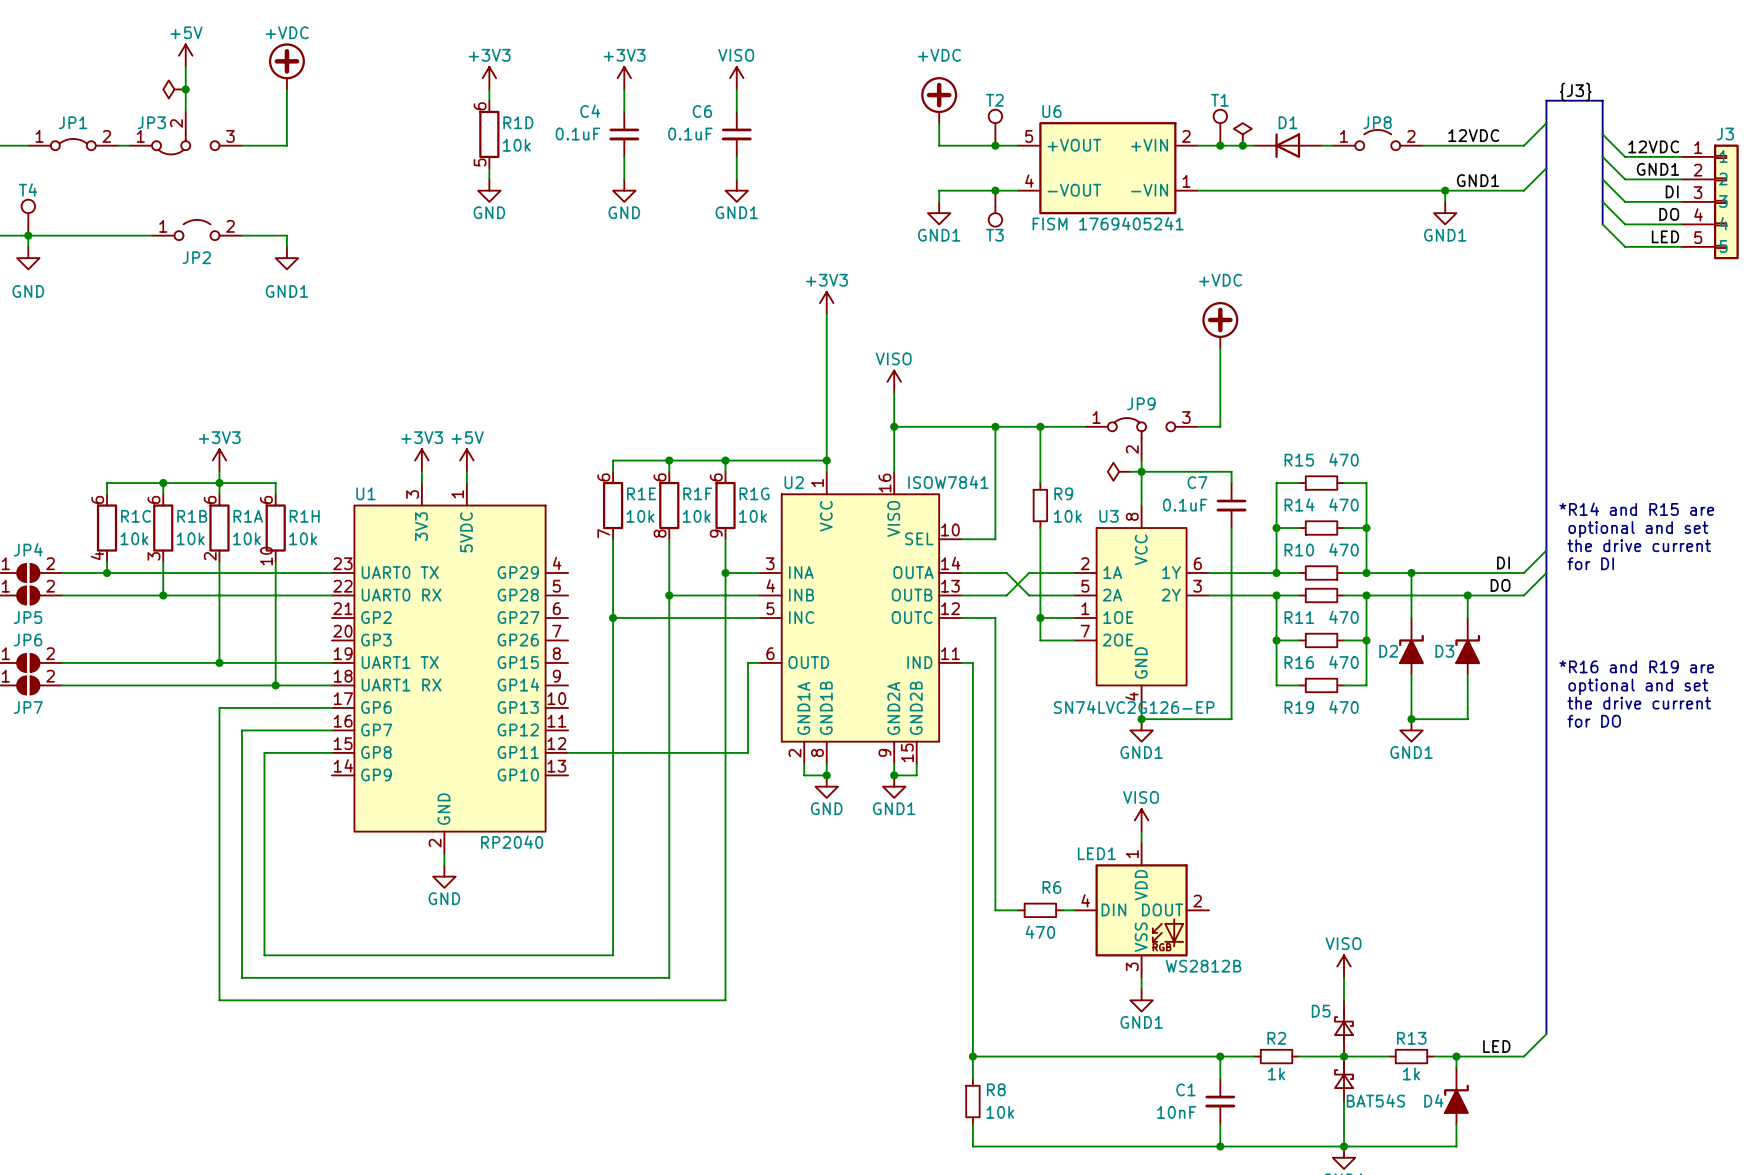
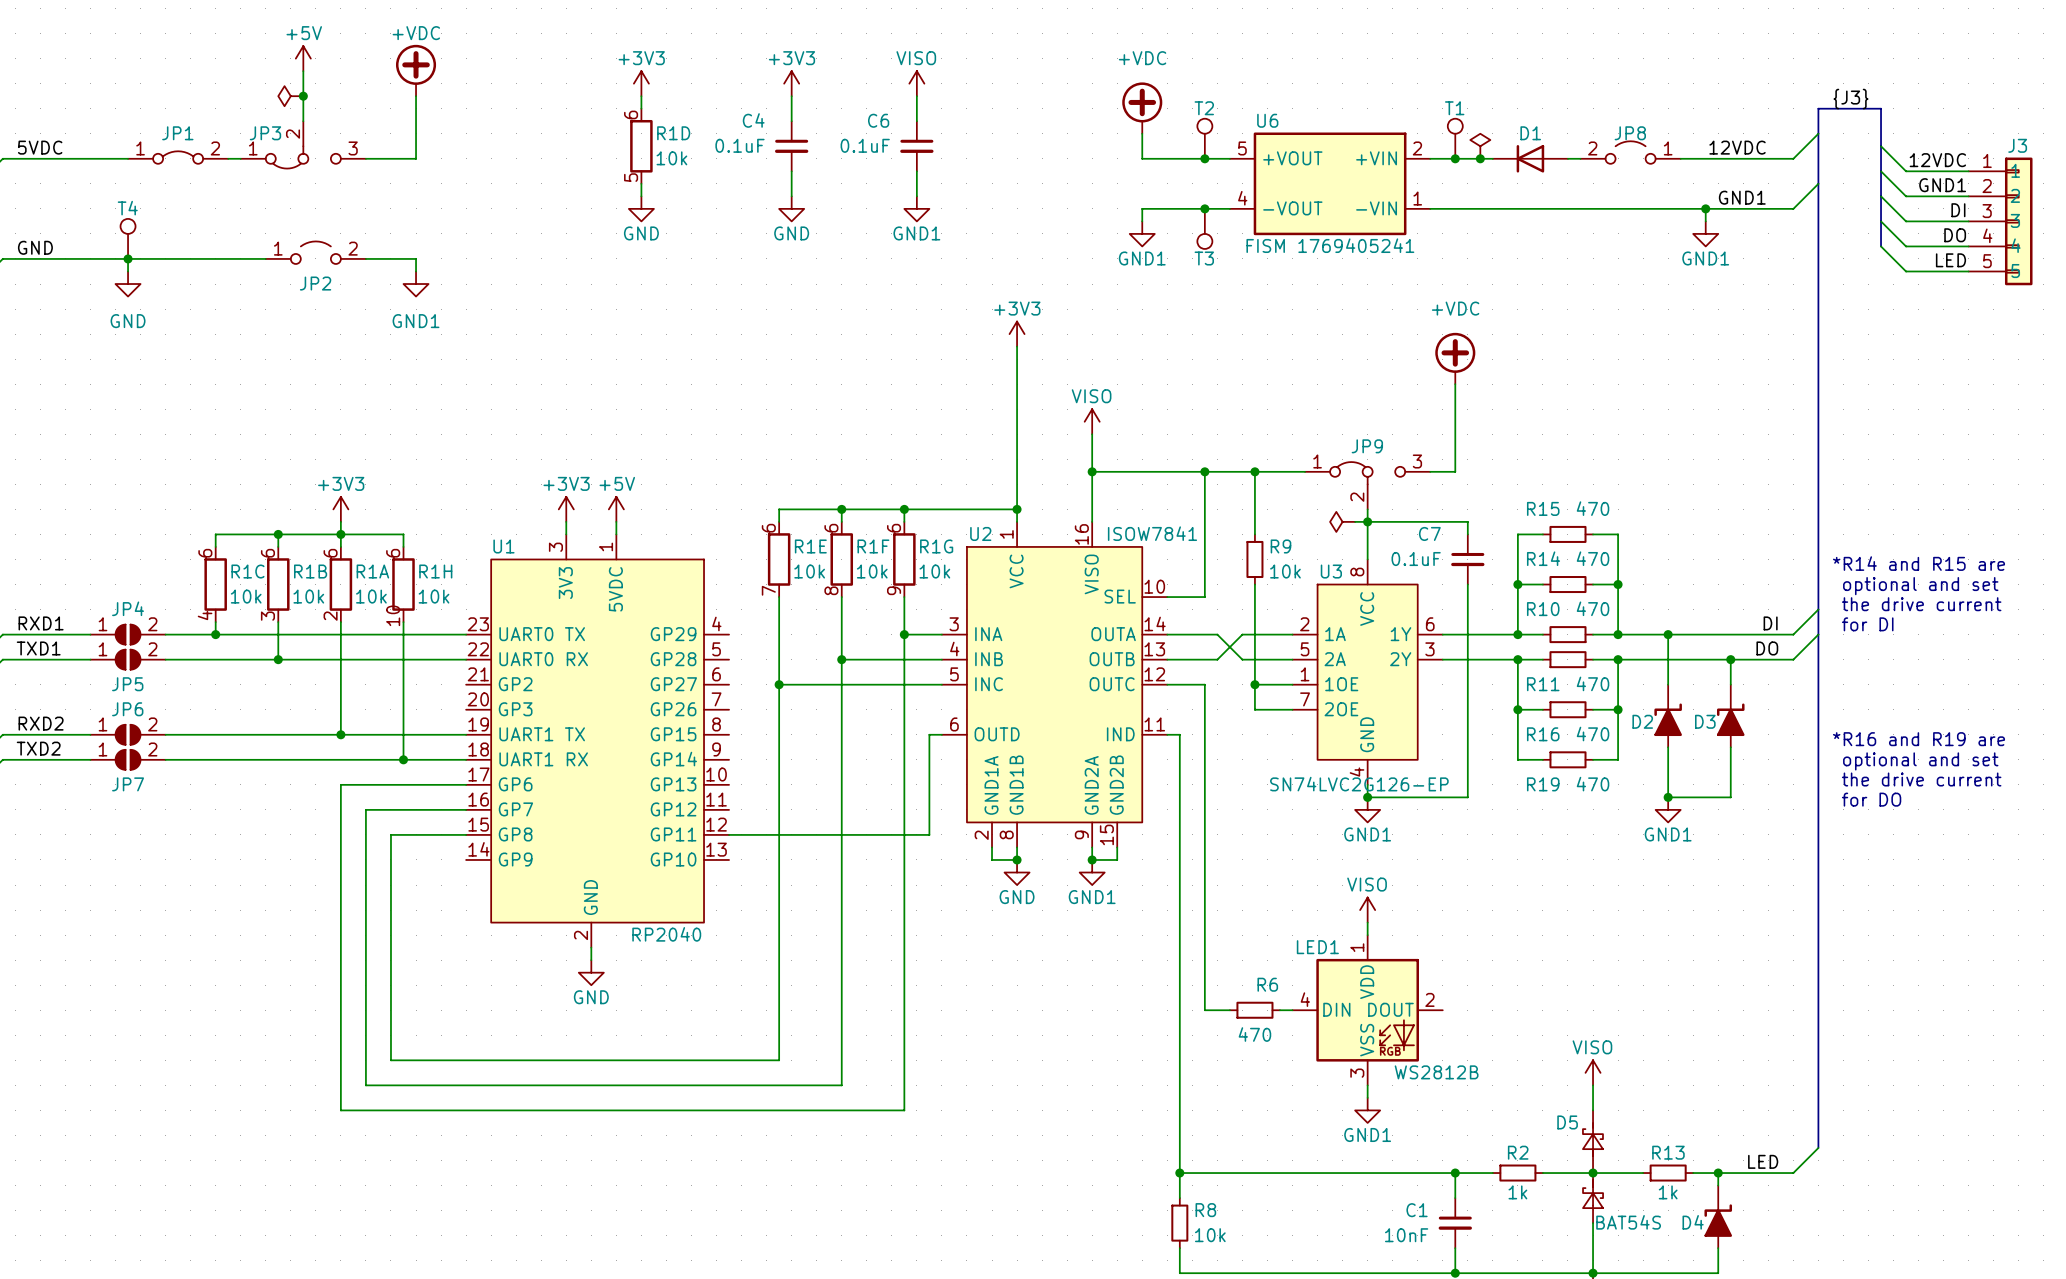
JP8 flip: as is (1377, 140) -> left-right (1630, 152)

